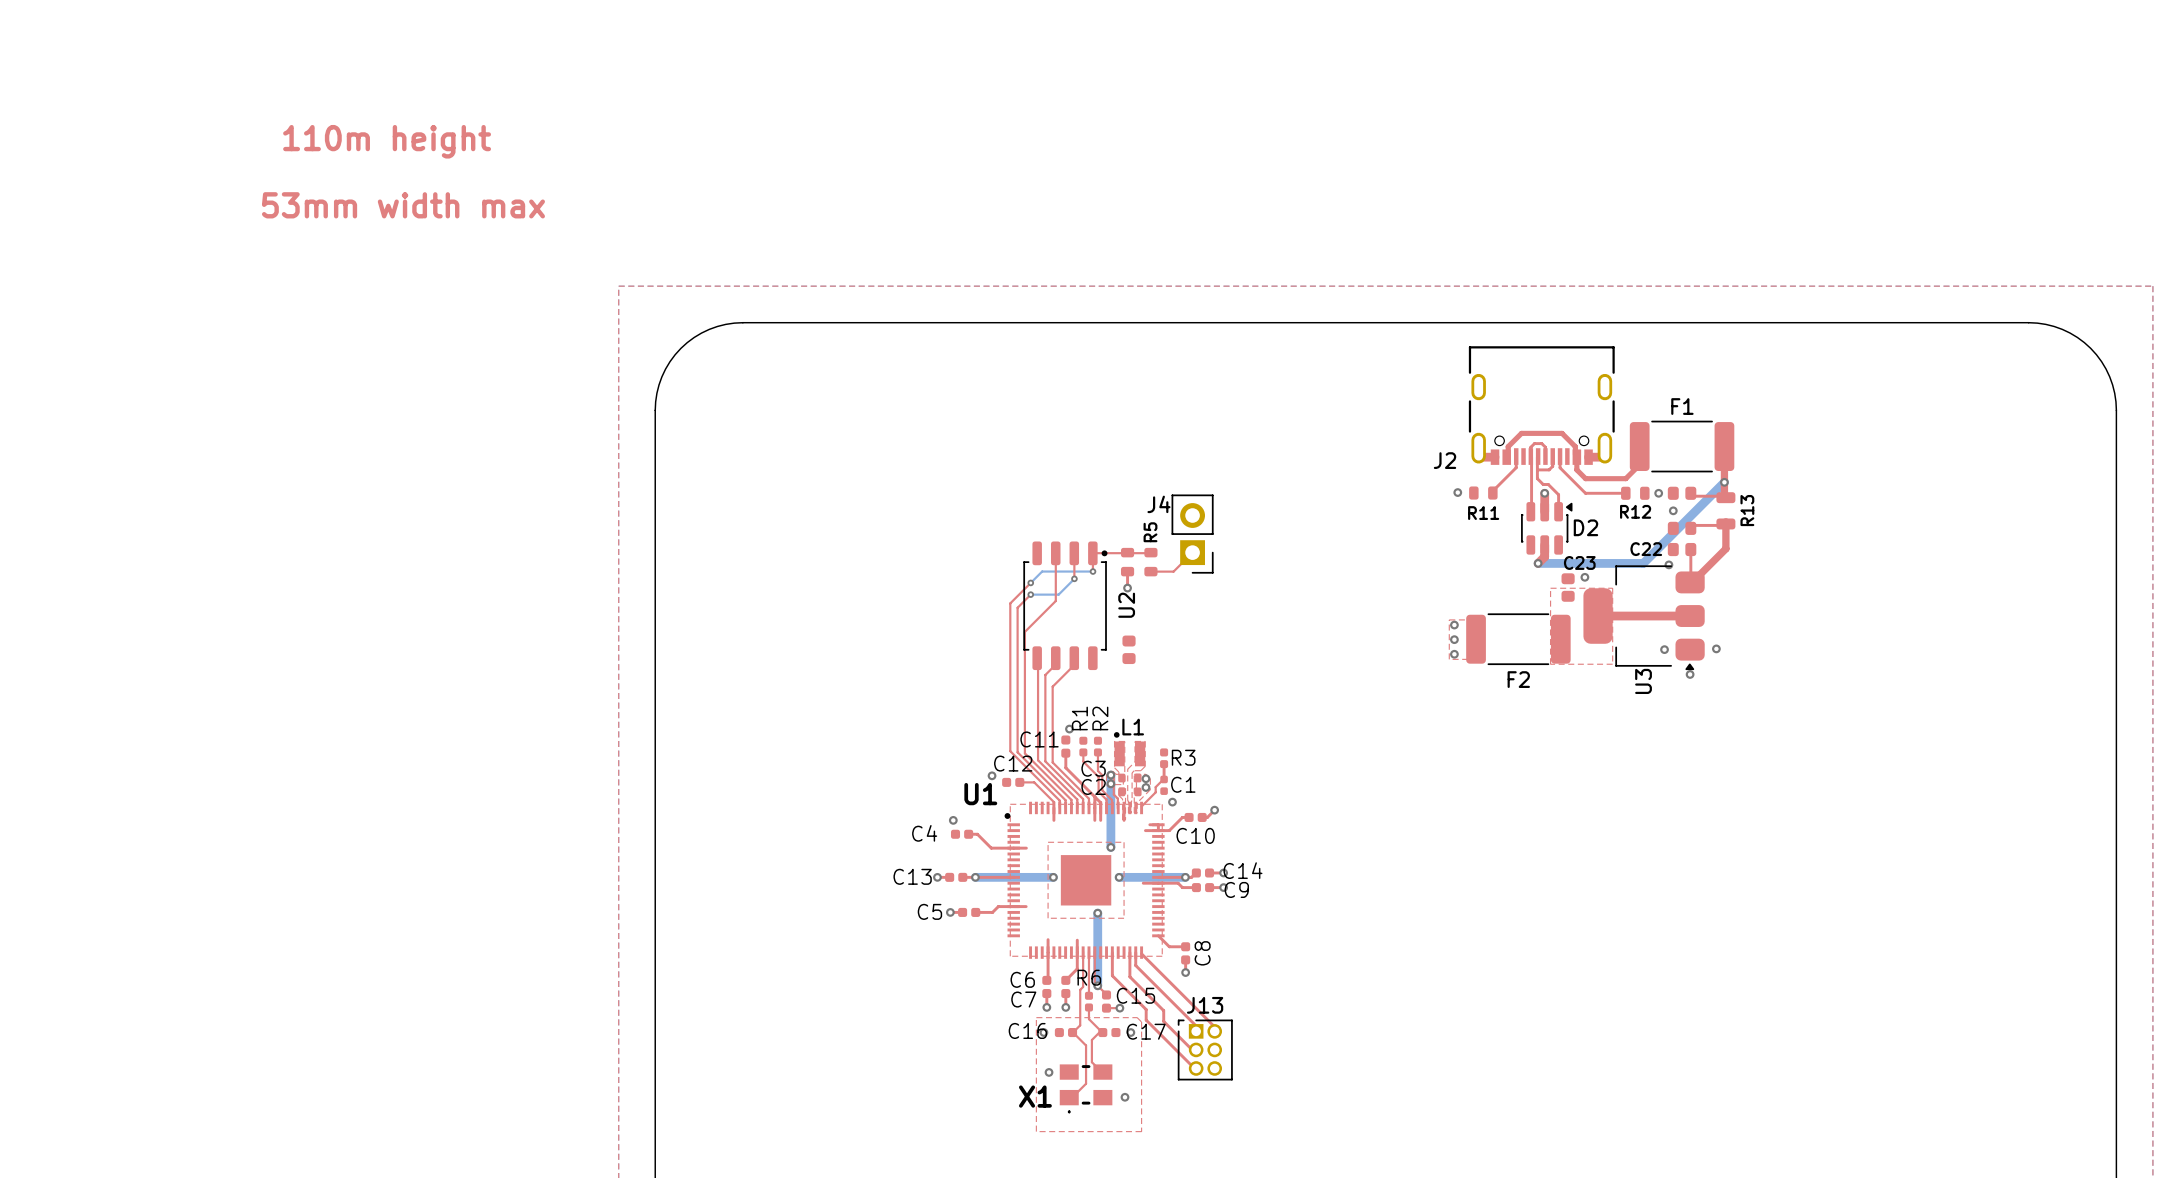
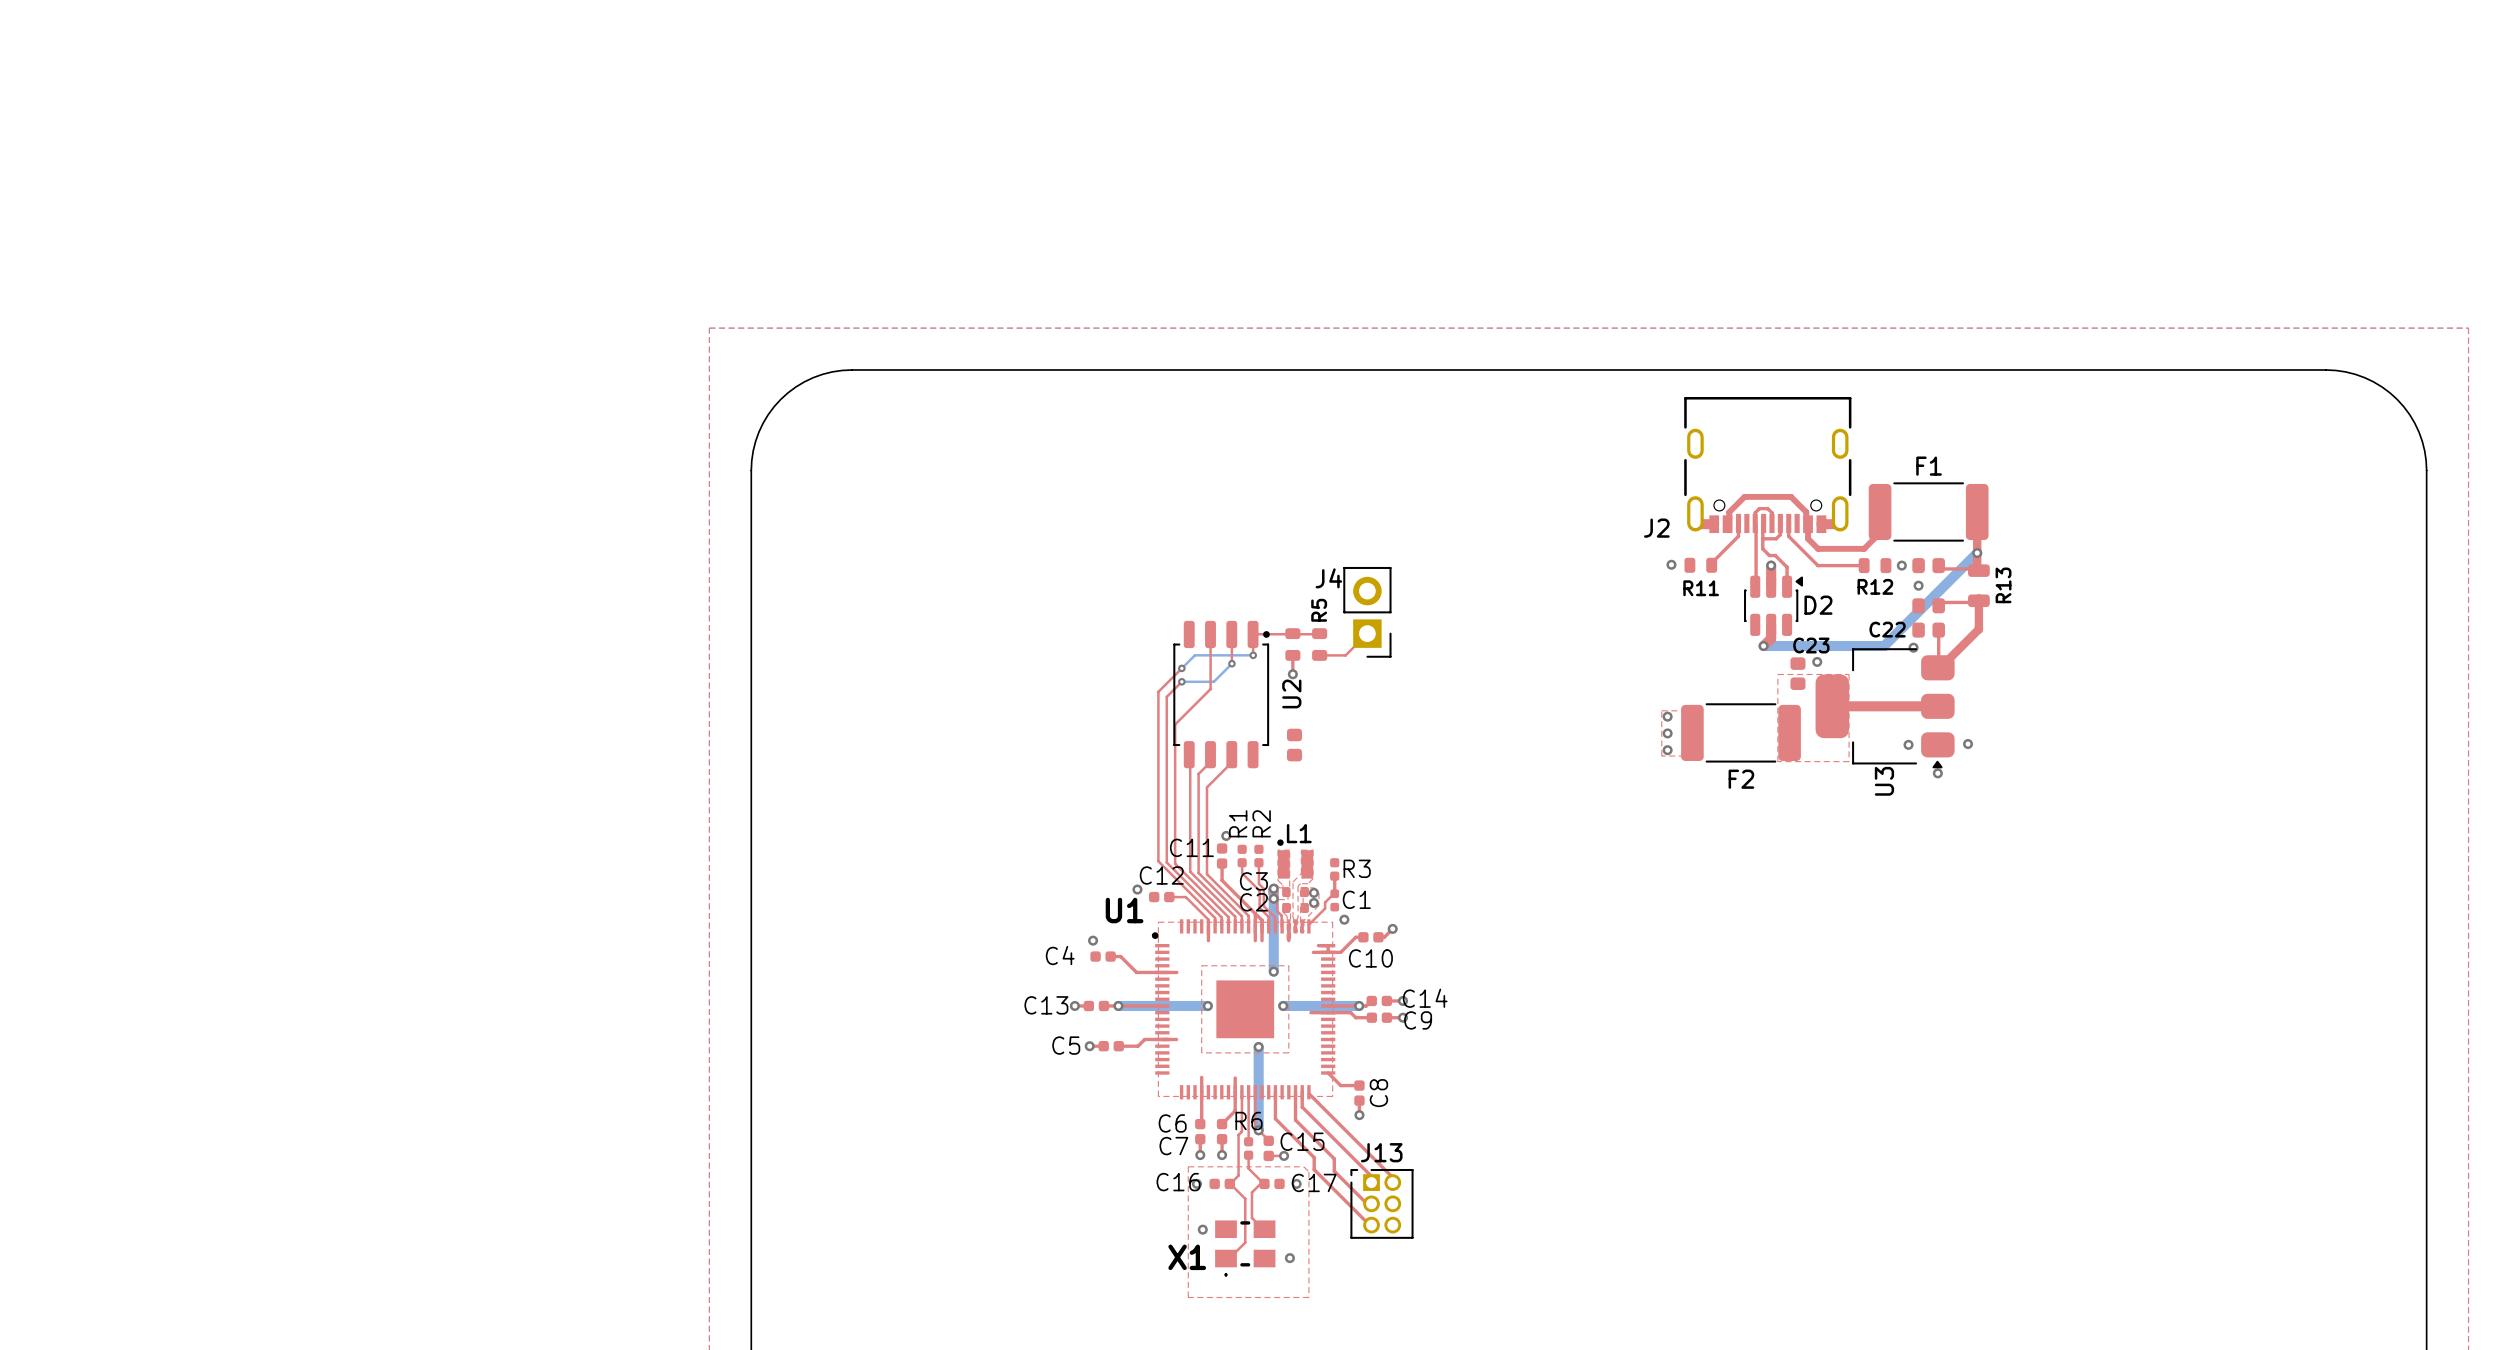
text: 110m height (387, 141) -> none
text: 53mm width max (403, 205) -> none

